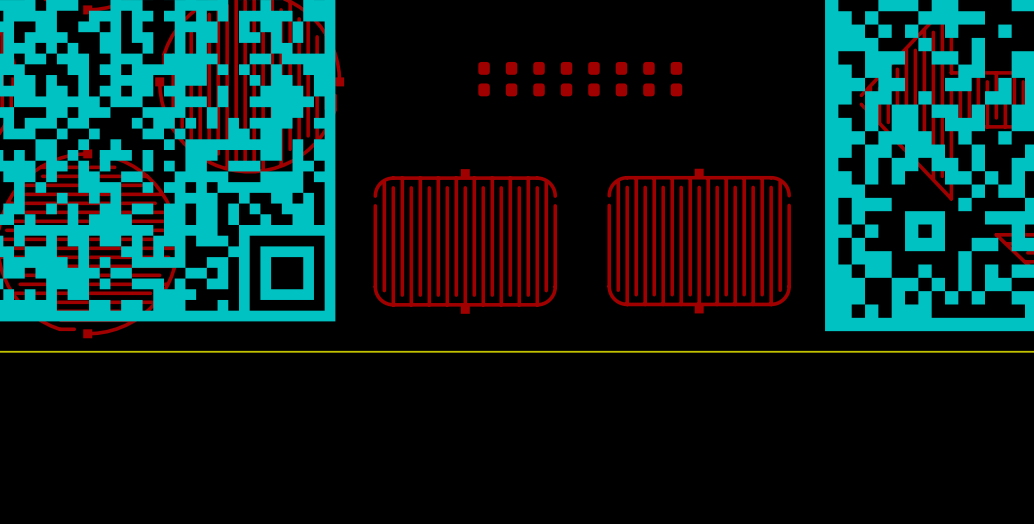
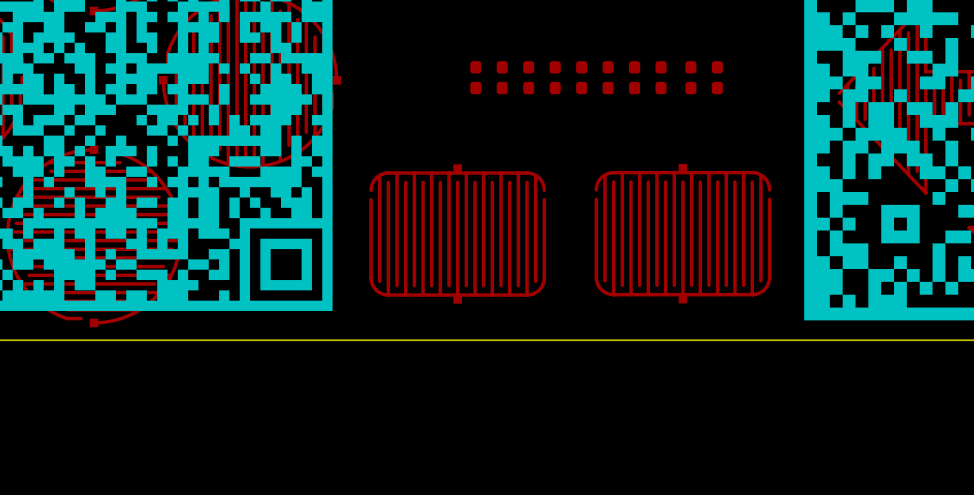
part: none -> (690, 77)
part: none -> (717, 77)

